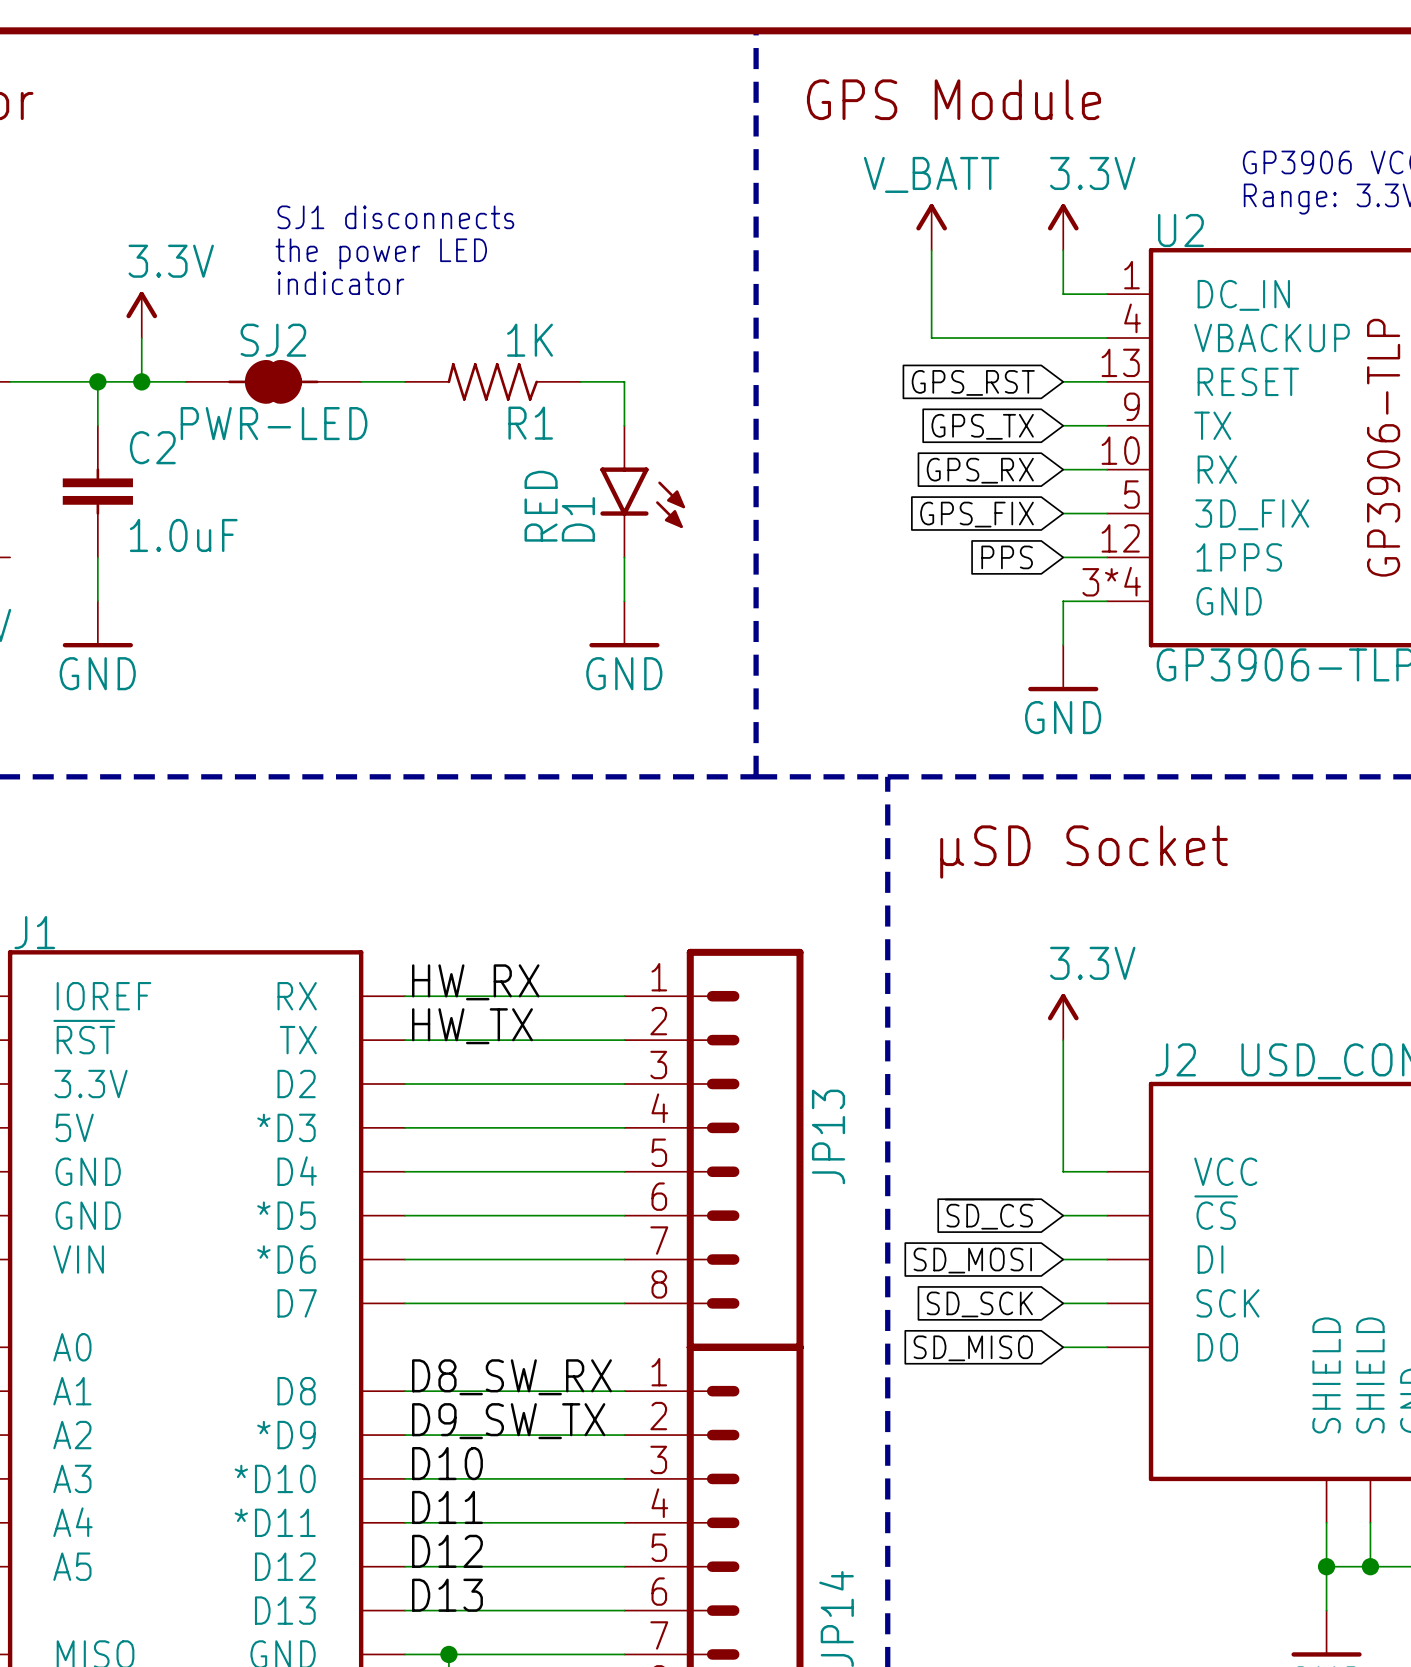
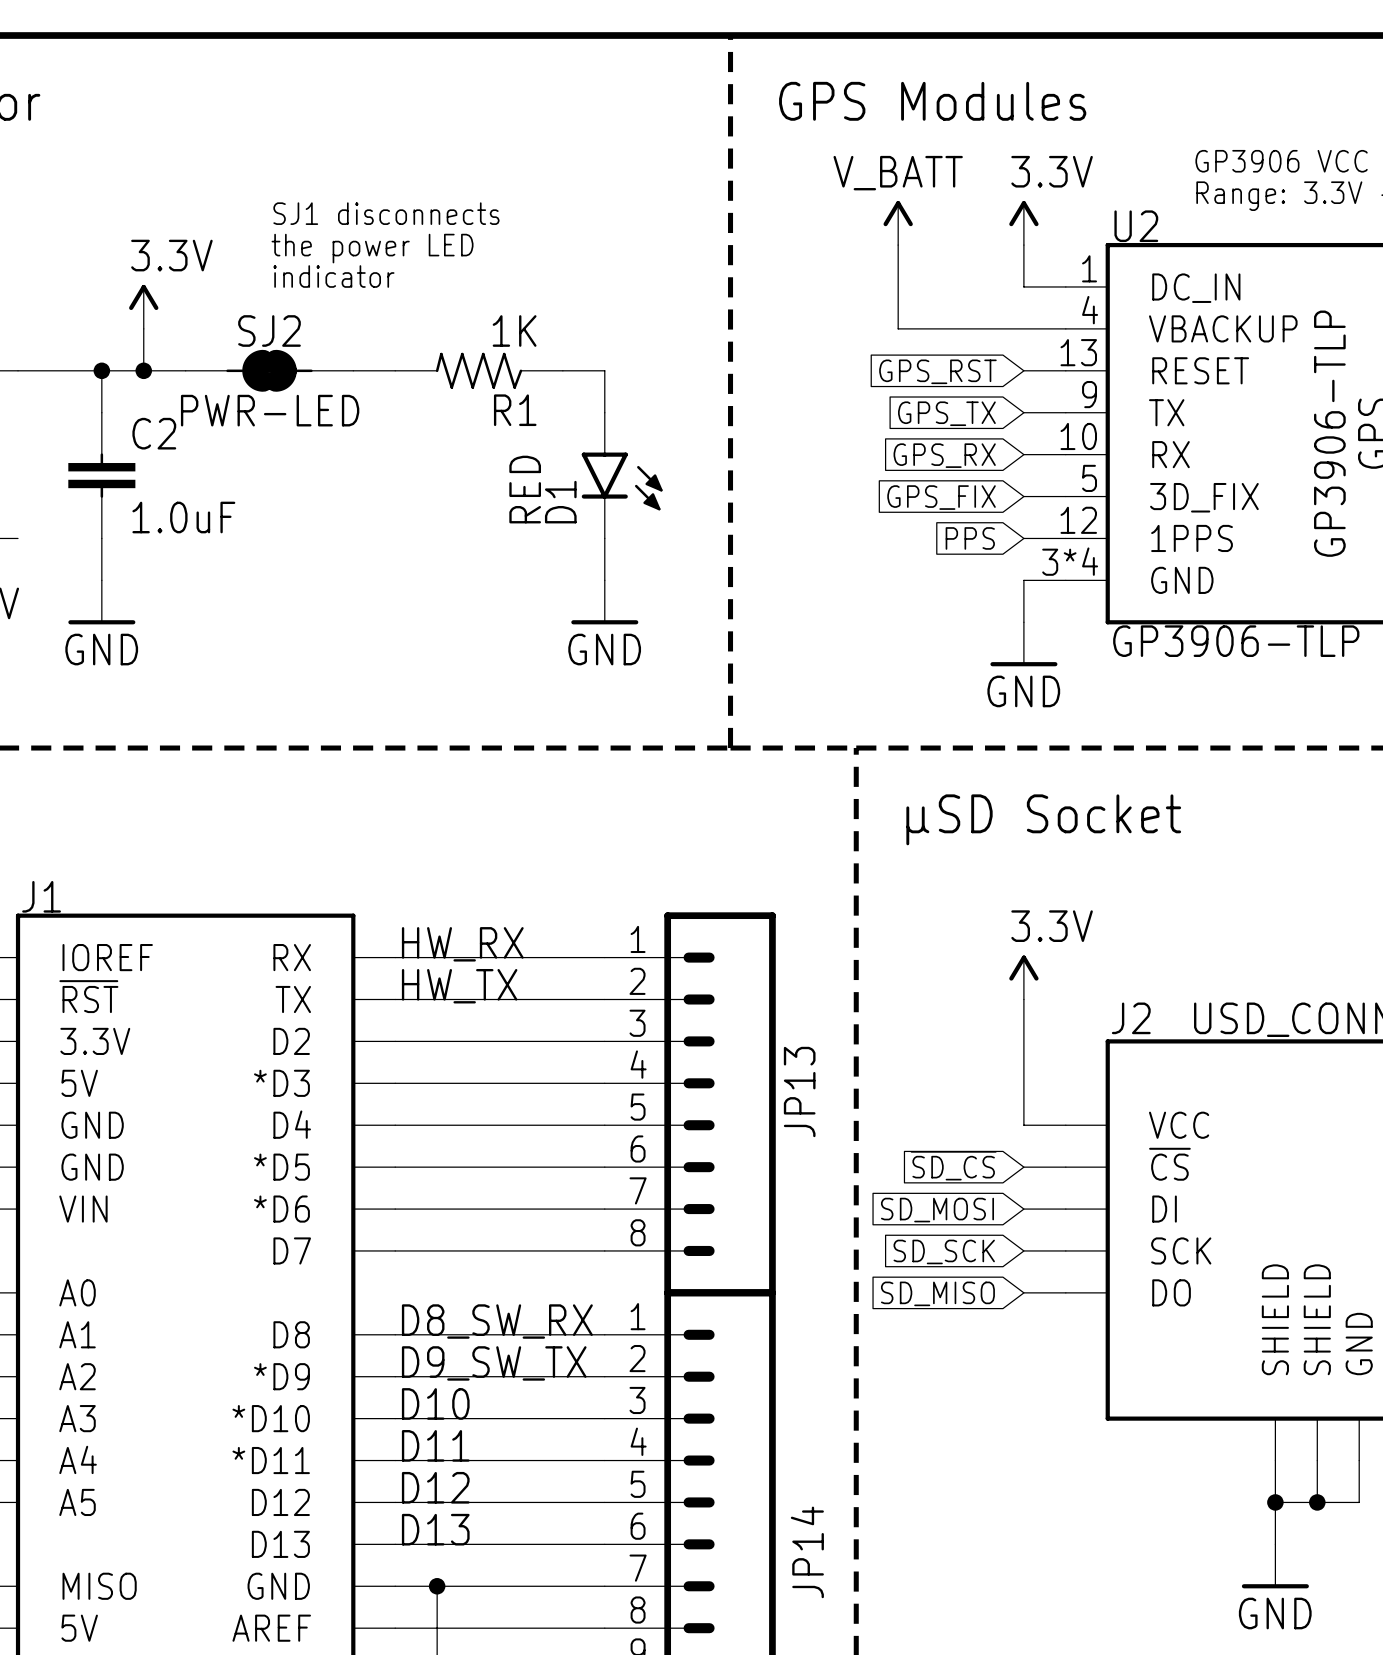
text: GPS Module (953, 99) -> GPS Modules (932, 101)

